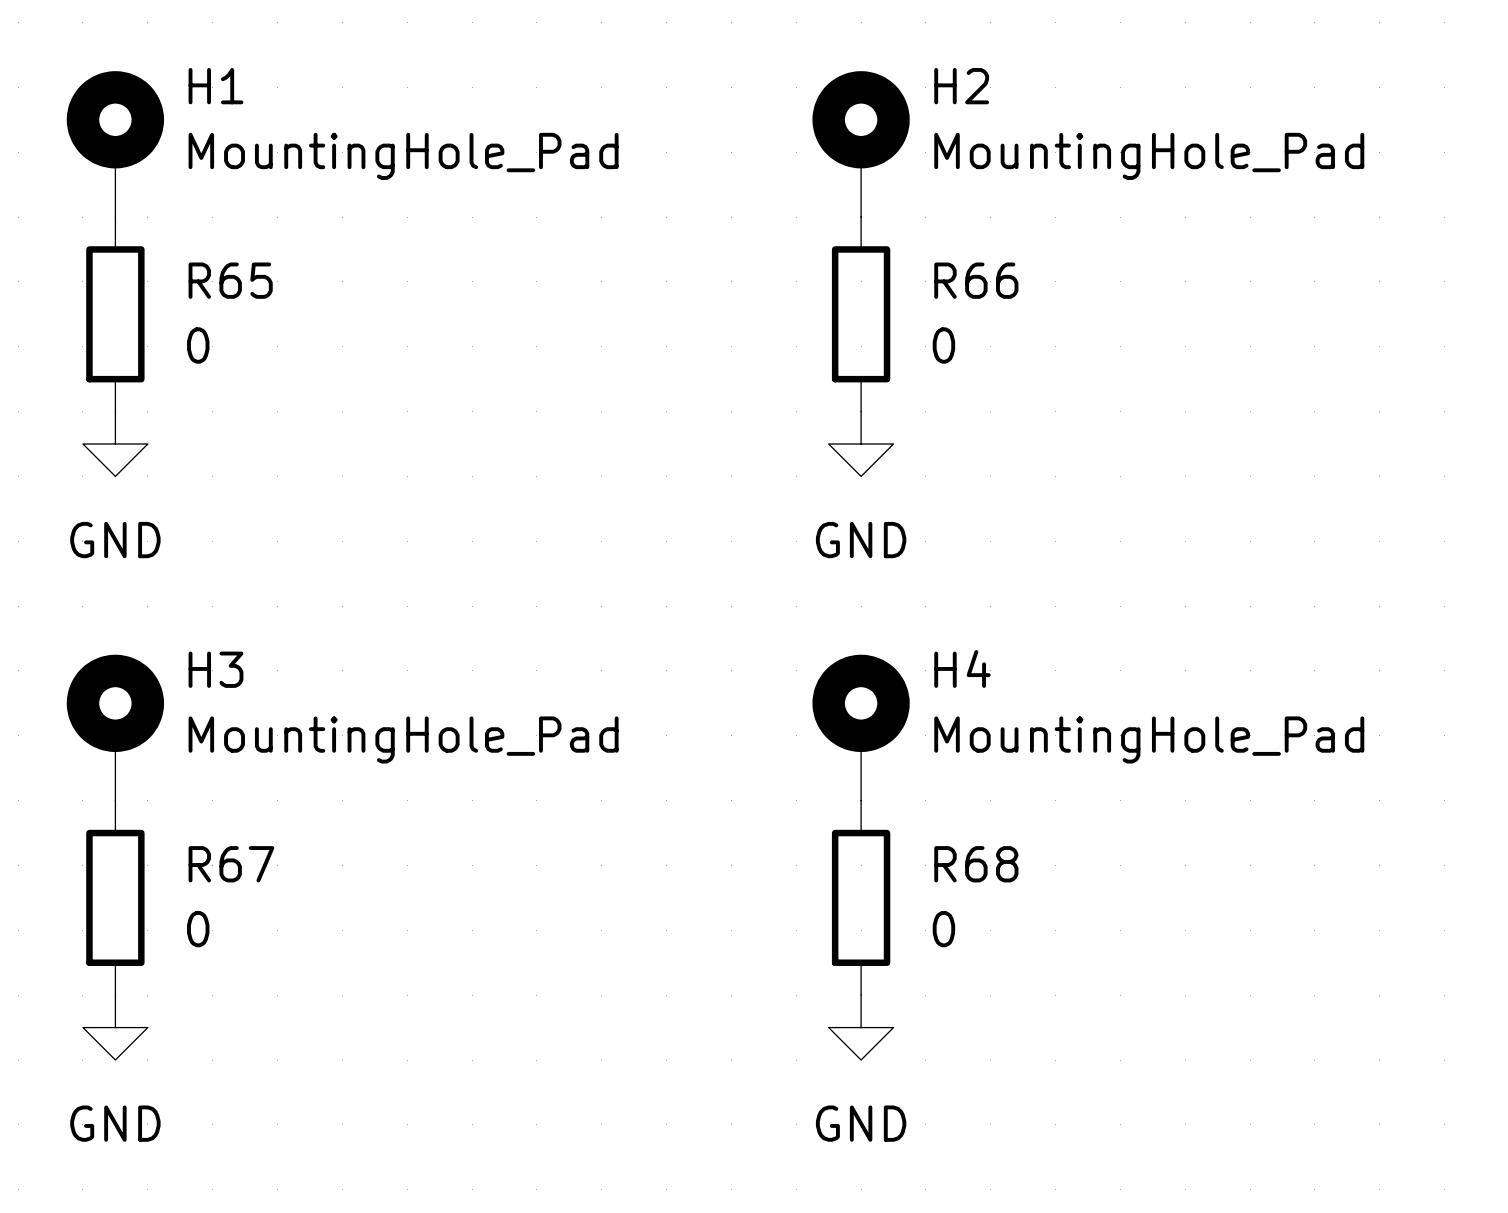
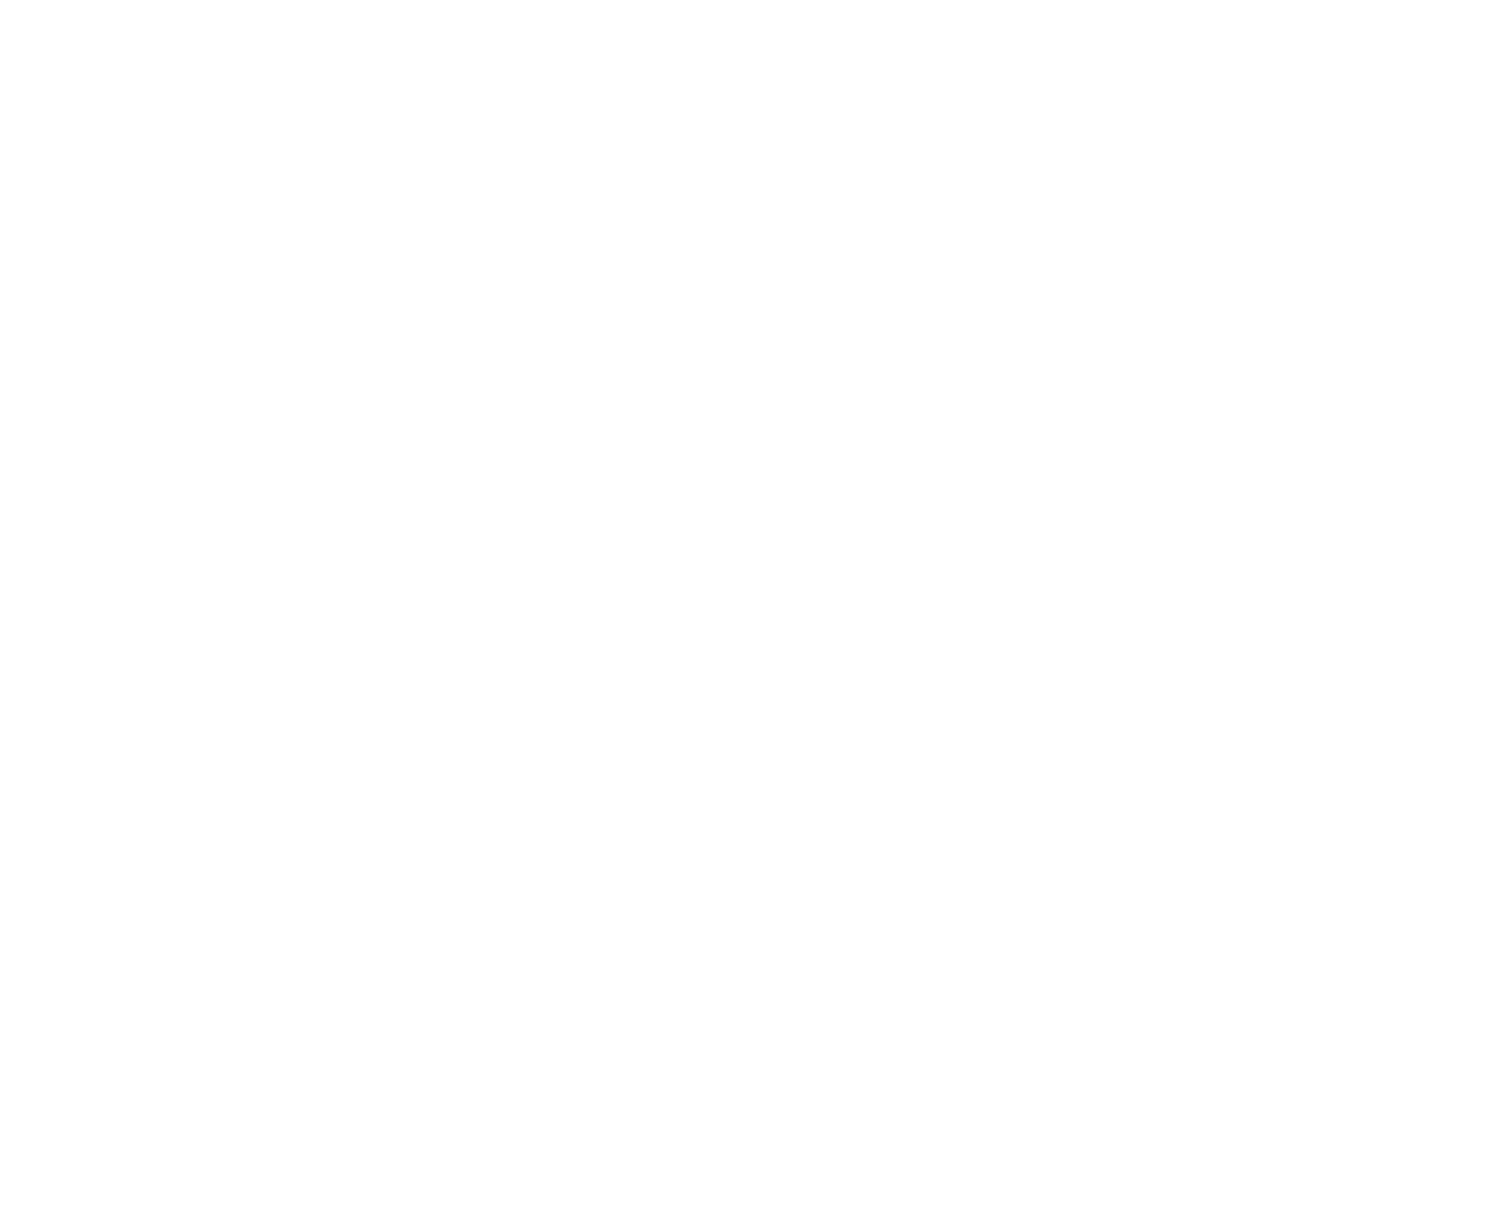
H1: MountingHole_Pad (115, 144) -> none
H2: MountingHole_Pad (861, 144) -> none
R65: 0 (115, 314) -> none
R66: 0 (861, 314) -> none
power symbol: GND (115, 443) -> none
power symbol: GND (861, 443) -> none
H3: MountingHole_Pad (115, 727) -> none
H4: MountingHole_Pad (861, 727) -> none
R67: 0 (115, 897) -> none
R68: 0 (861, 897) -> none
power symbol: GND (115, 1027) -> none
power symbol: GND (861, 1027) -> none

